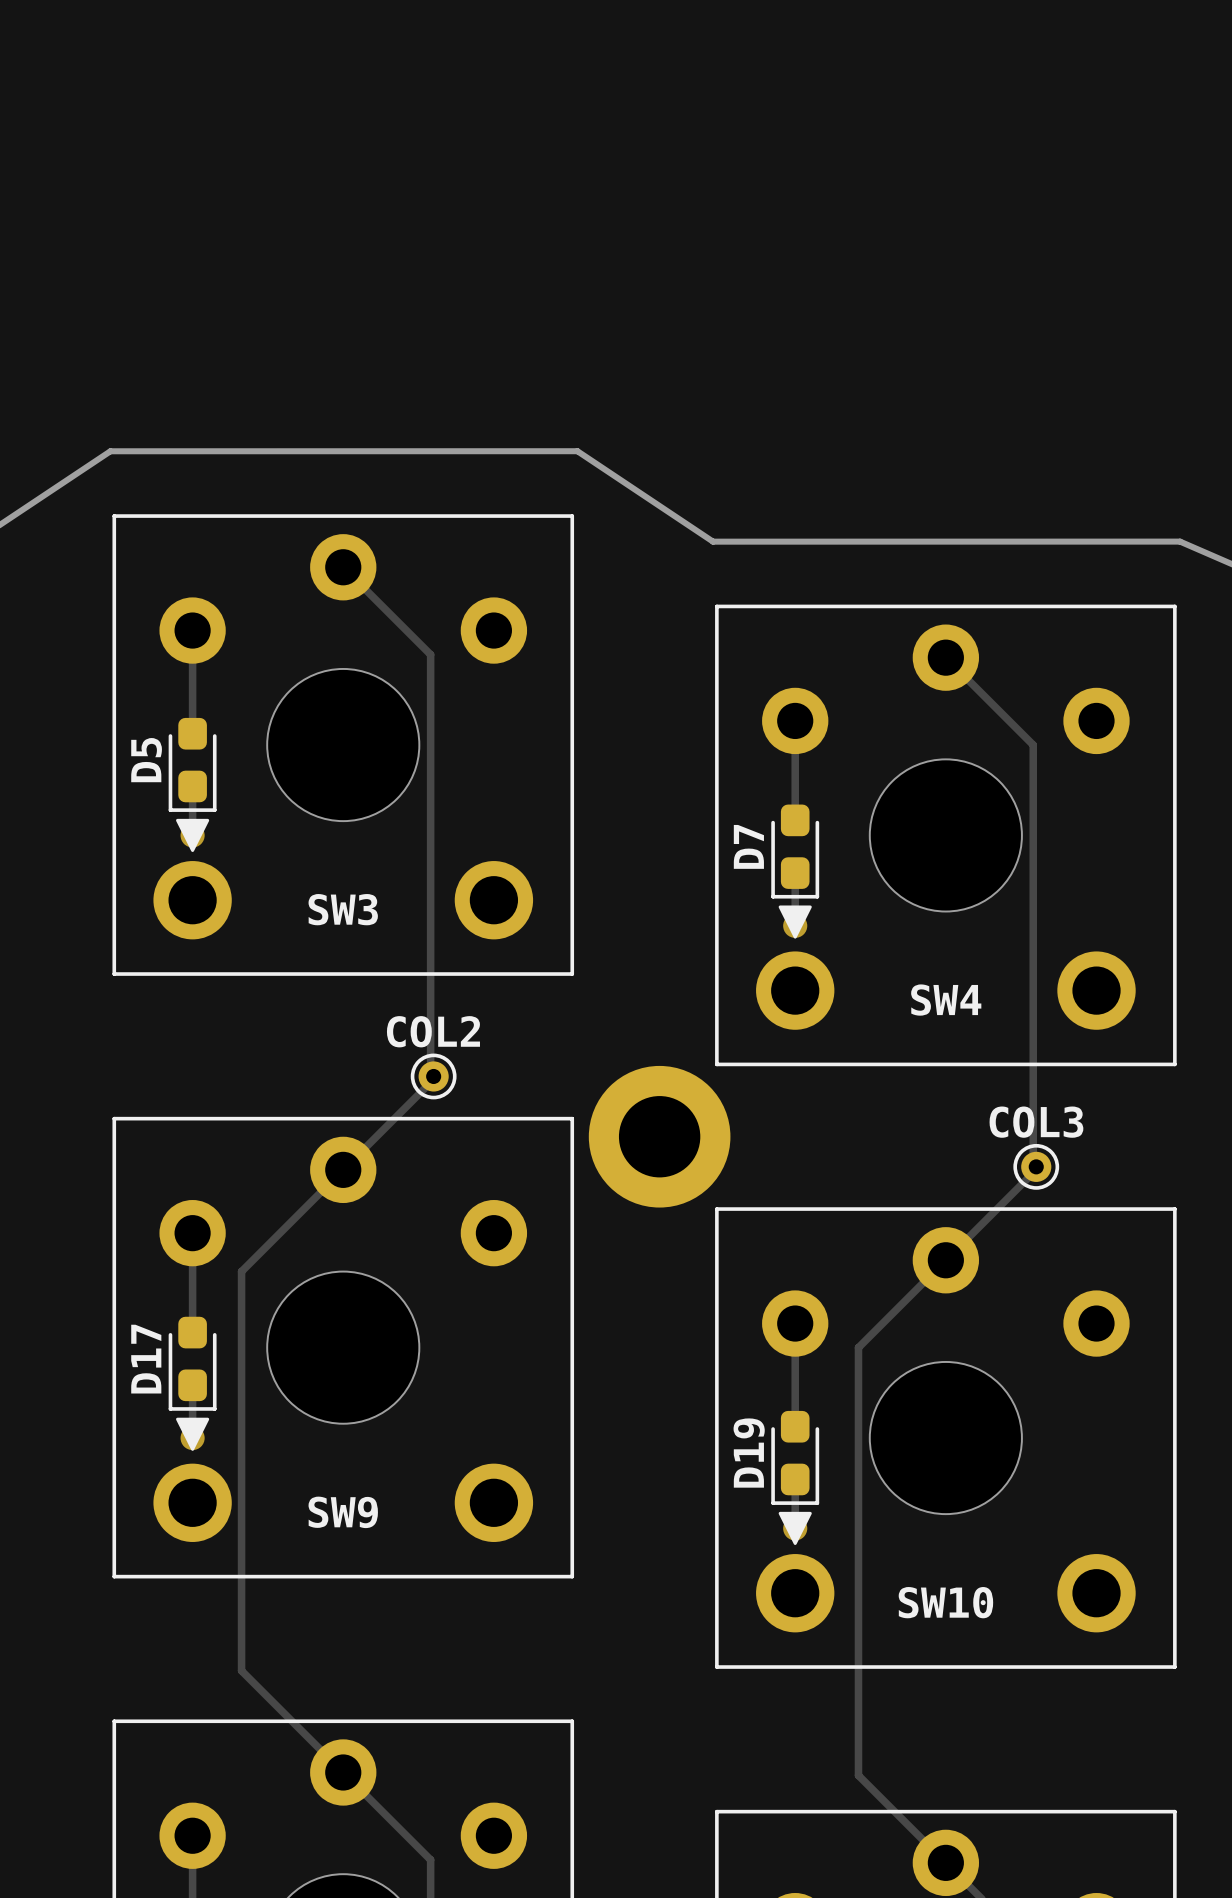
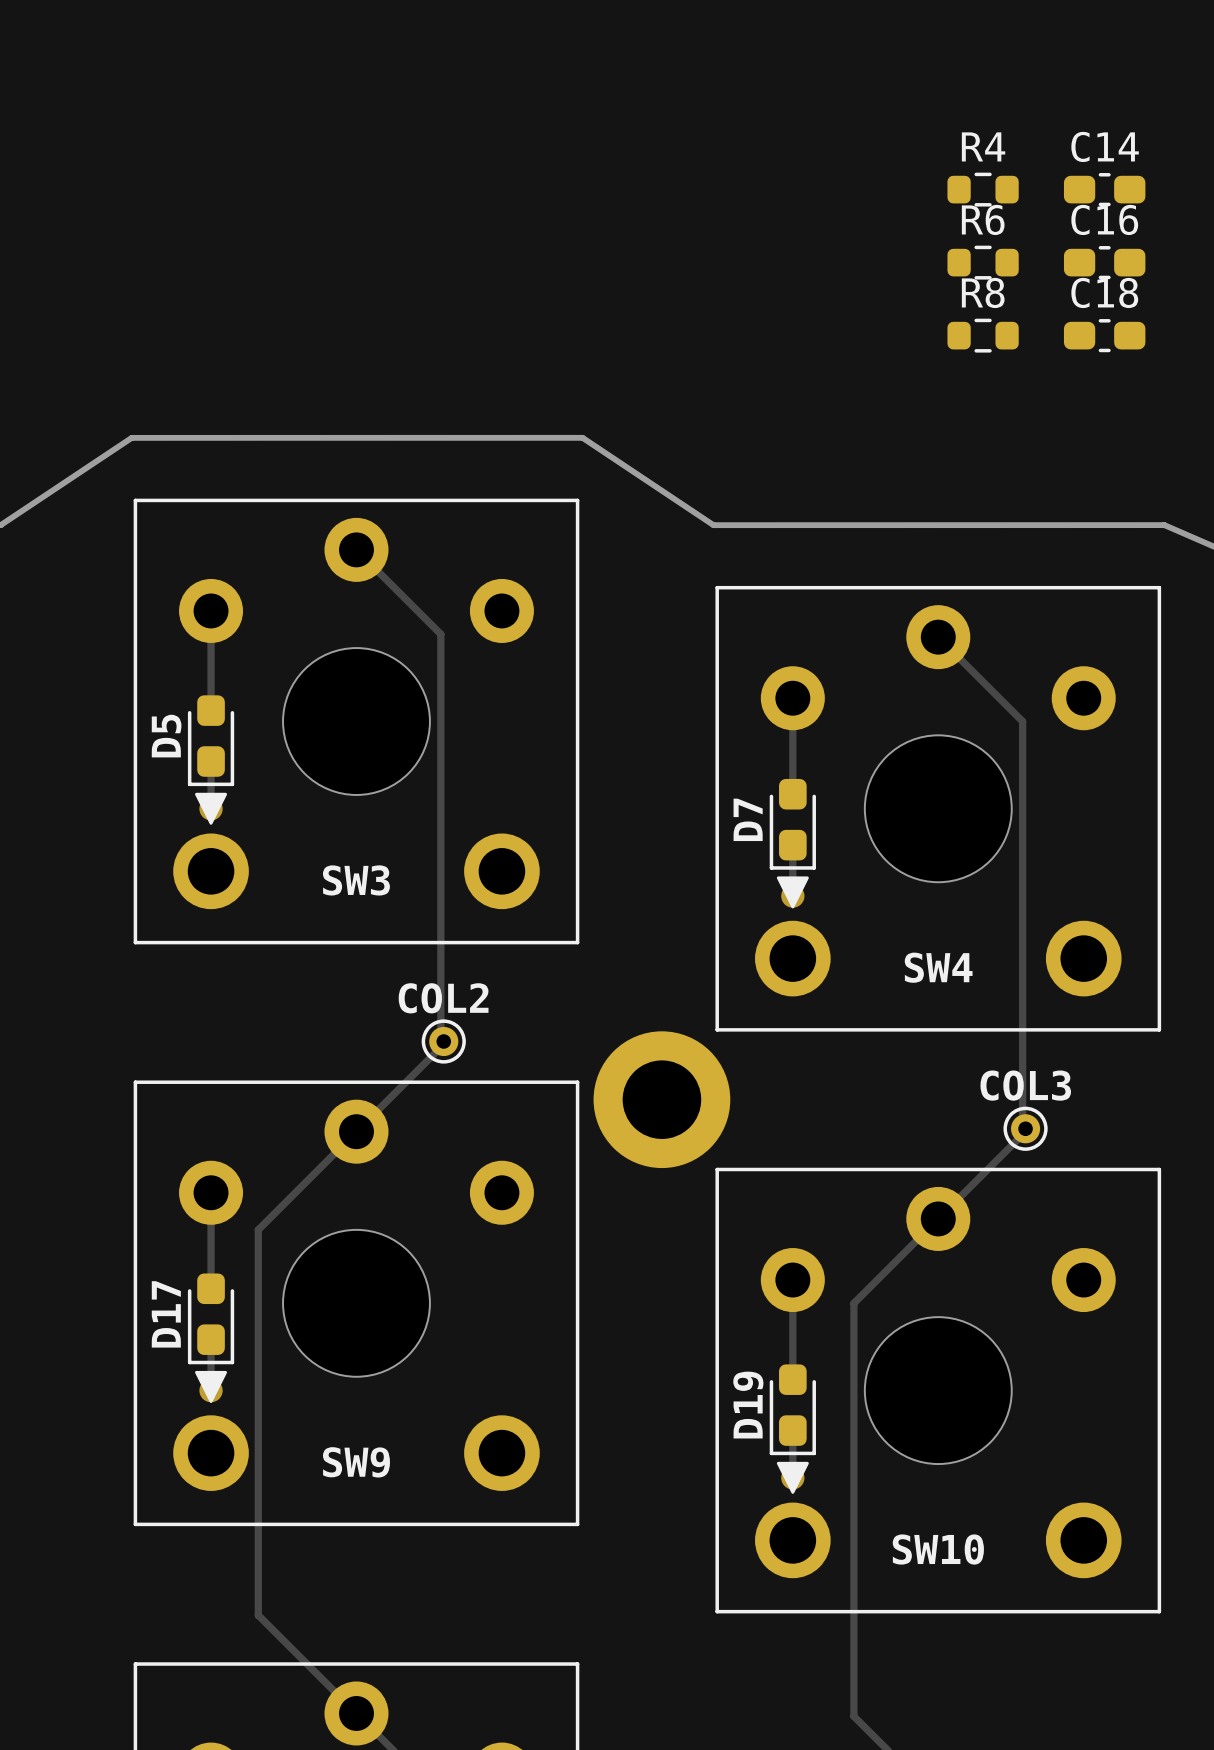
R4: none -> (983, 189)
C14: none -> (1104, 189)
R6: none -> (983, 262)
C16: none -> (1104, 262)
R8: none -> (983, 335)
C18: none -> (1104, 335)

